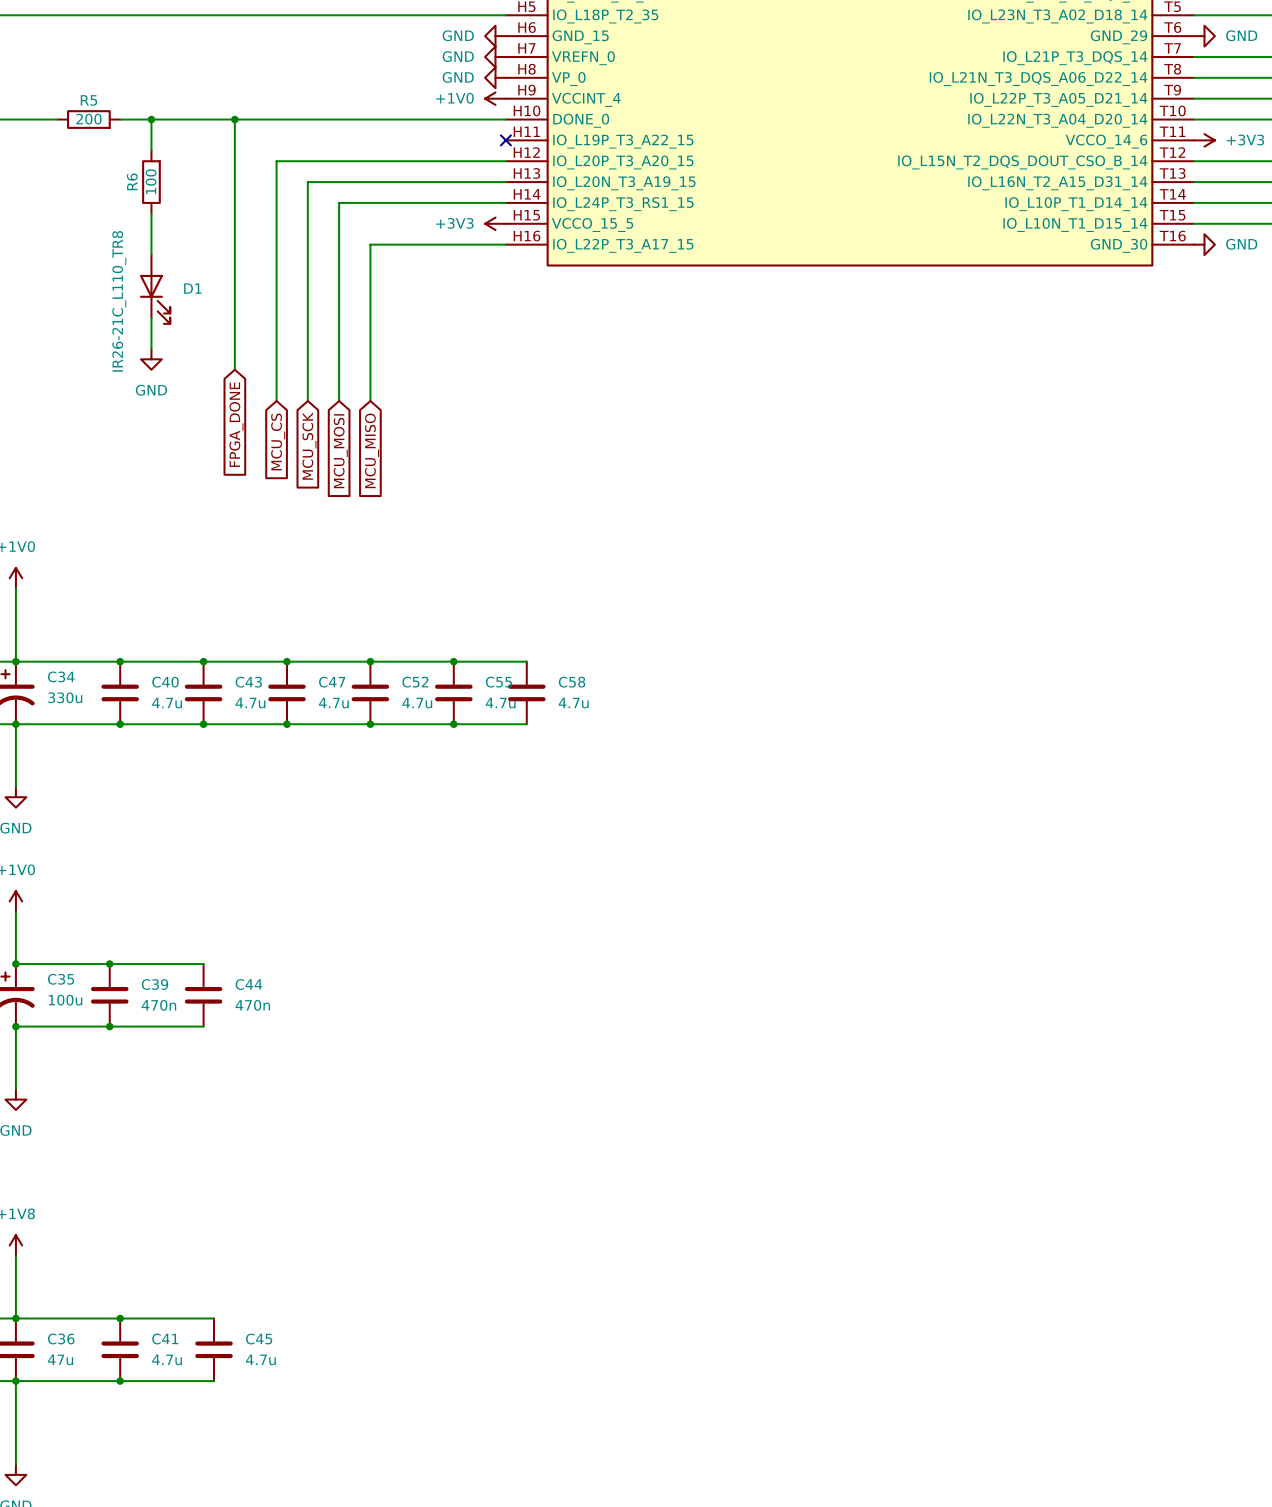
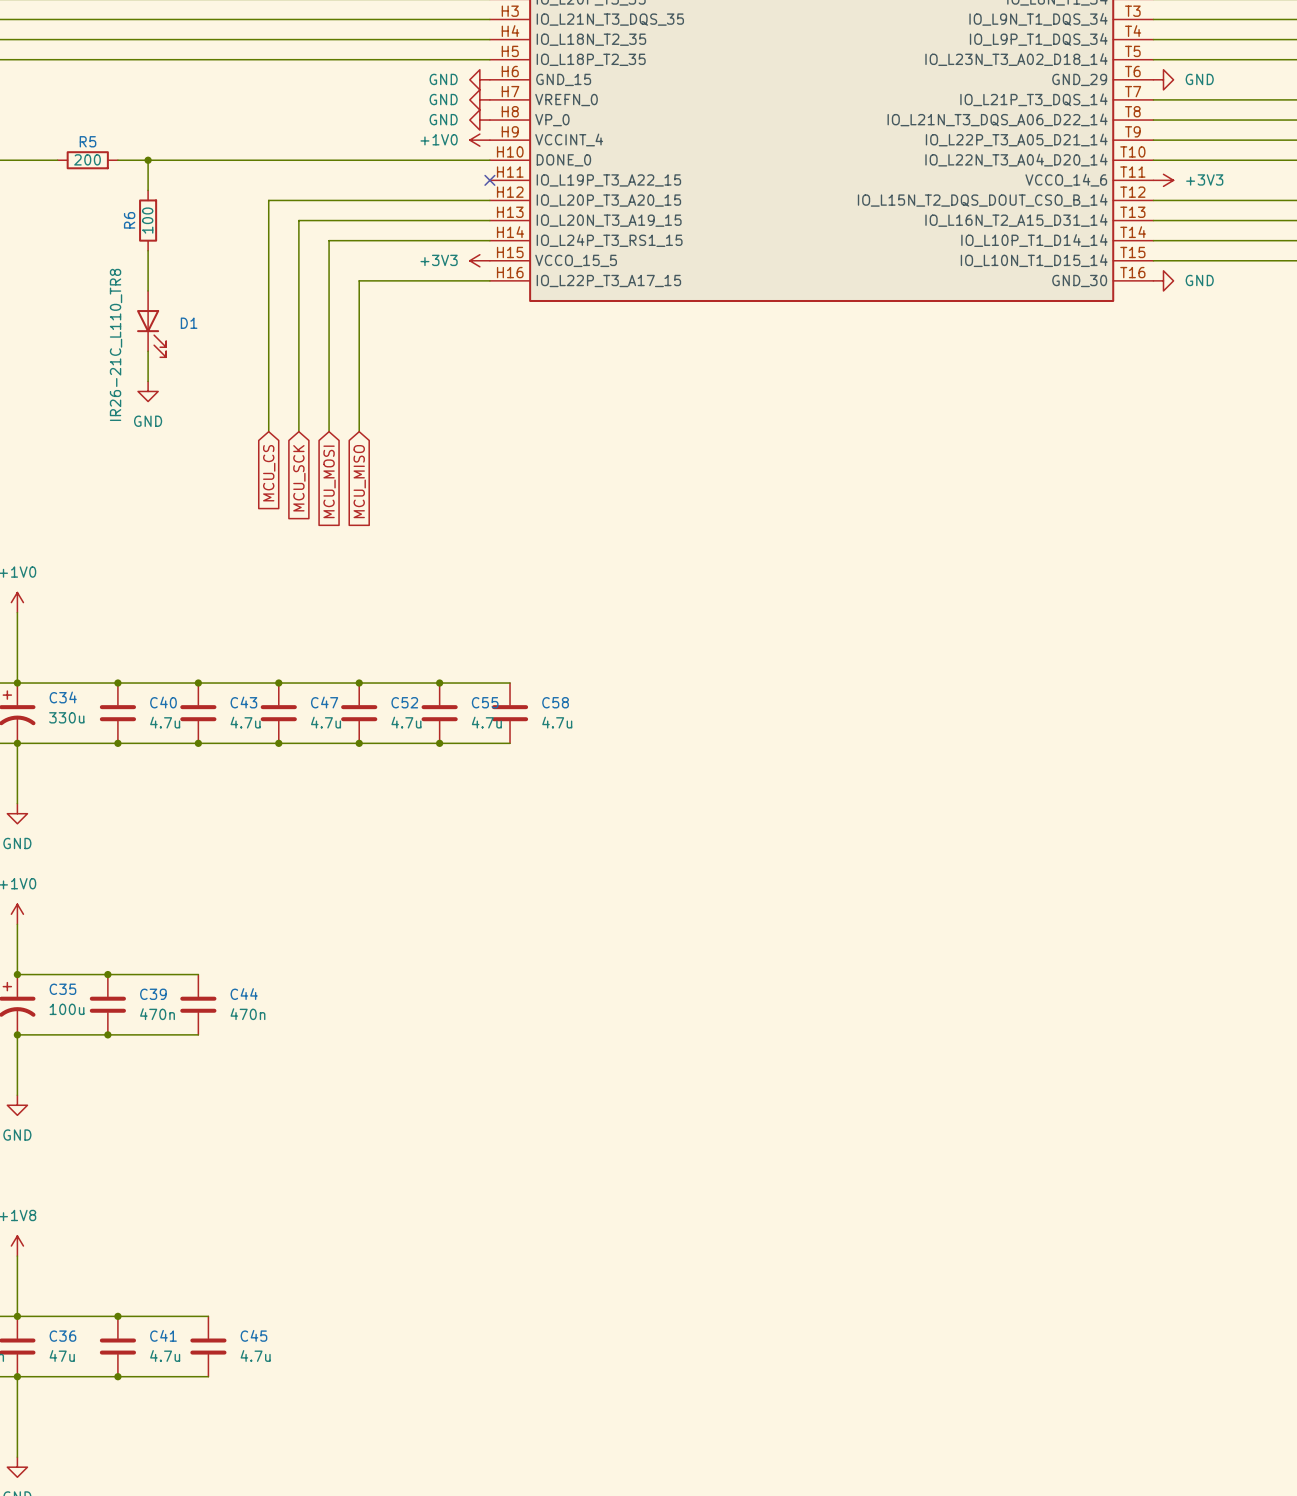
wire: (234, 119) (234, 369) -> none
junction: (234, 119) -> none
global label: FPGA_DONE (236, 424) -> none

